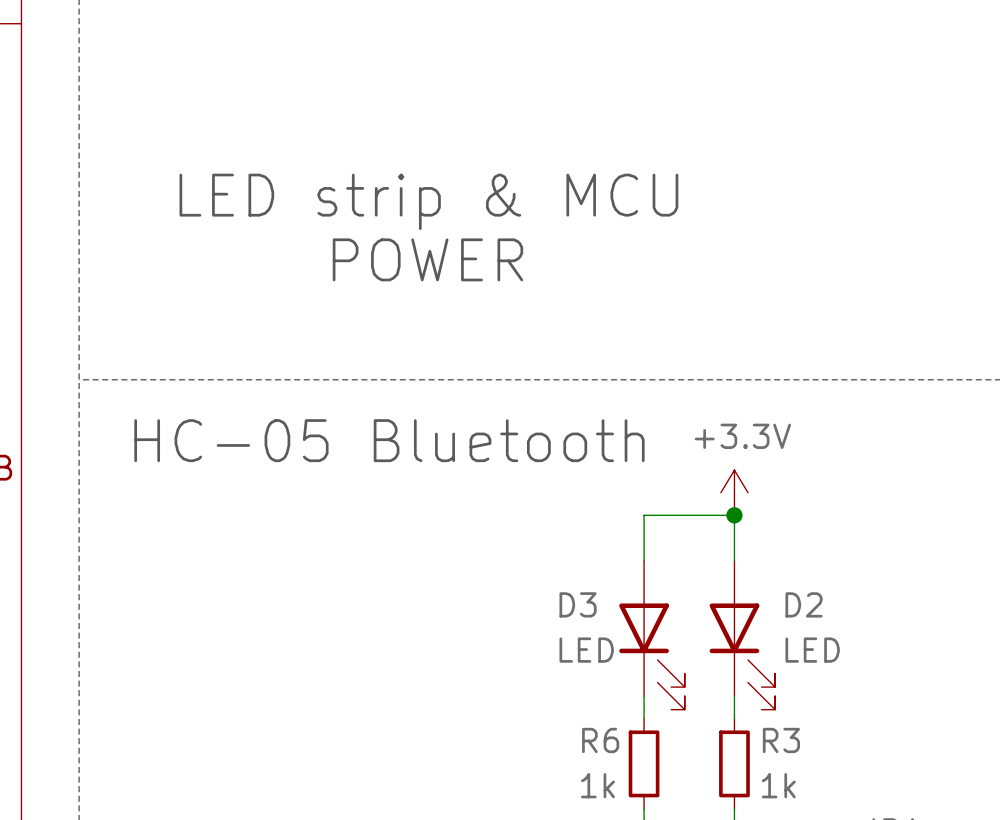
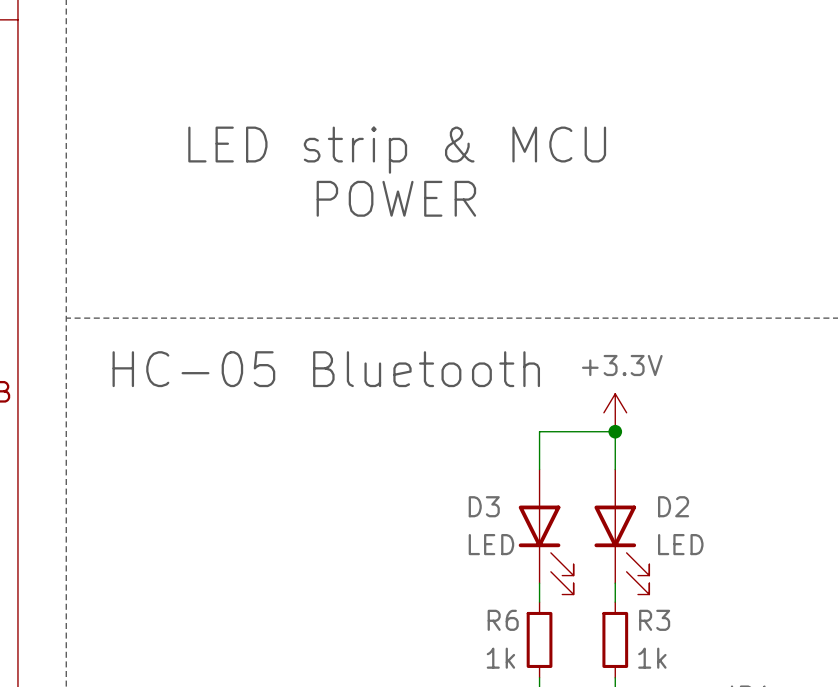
text position: LED strip & MCU (428, 201) -> LED strip & MCU (397, 150)
text position: POWER (427, 259) -> POWER (396, 198)

